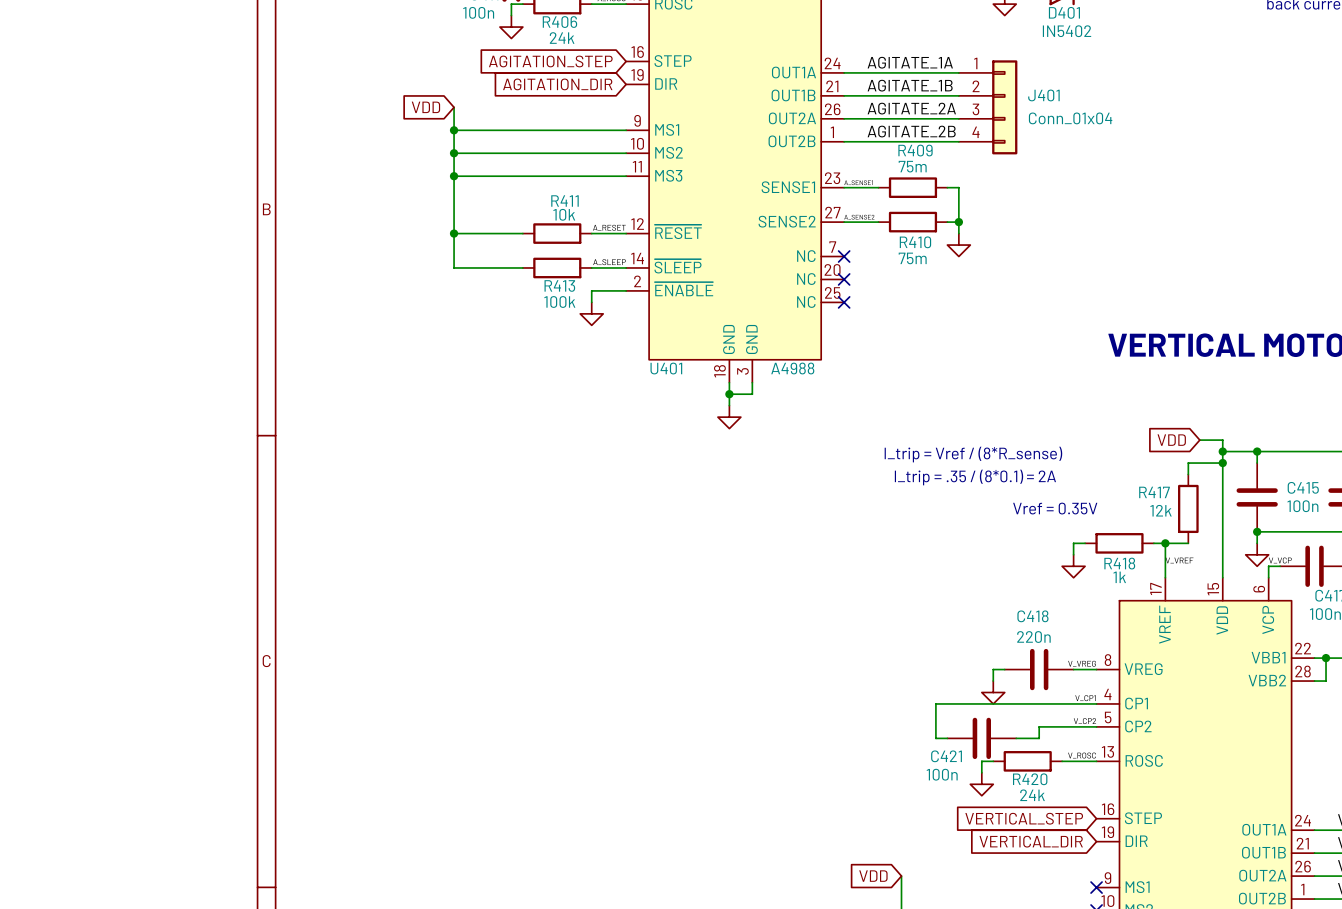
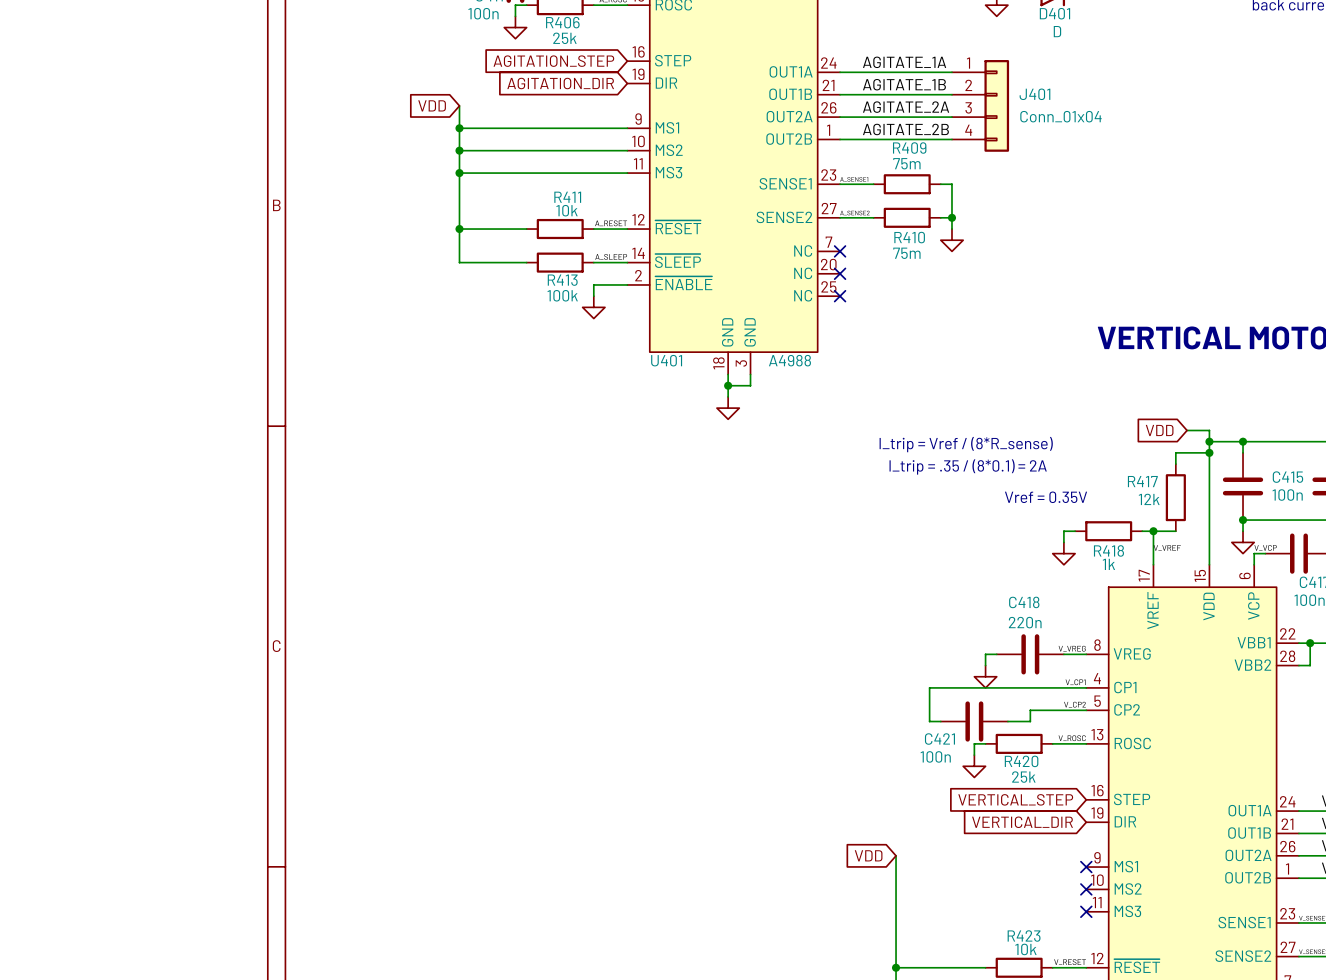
D401 value: IN5402 (1067, 31) -> D (1057, 31)
R406 value: 24k (562, 38) -> 25k (564, 38)
R420 value: 24k (1032, 795) -> 25k (1023, 777)

